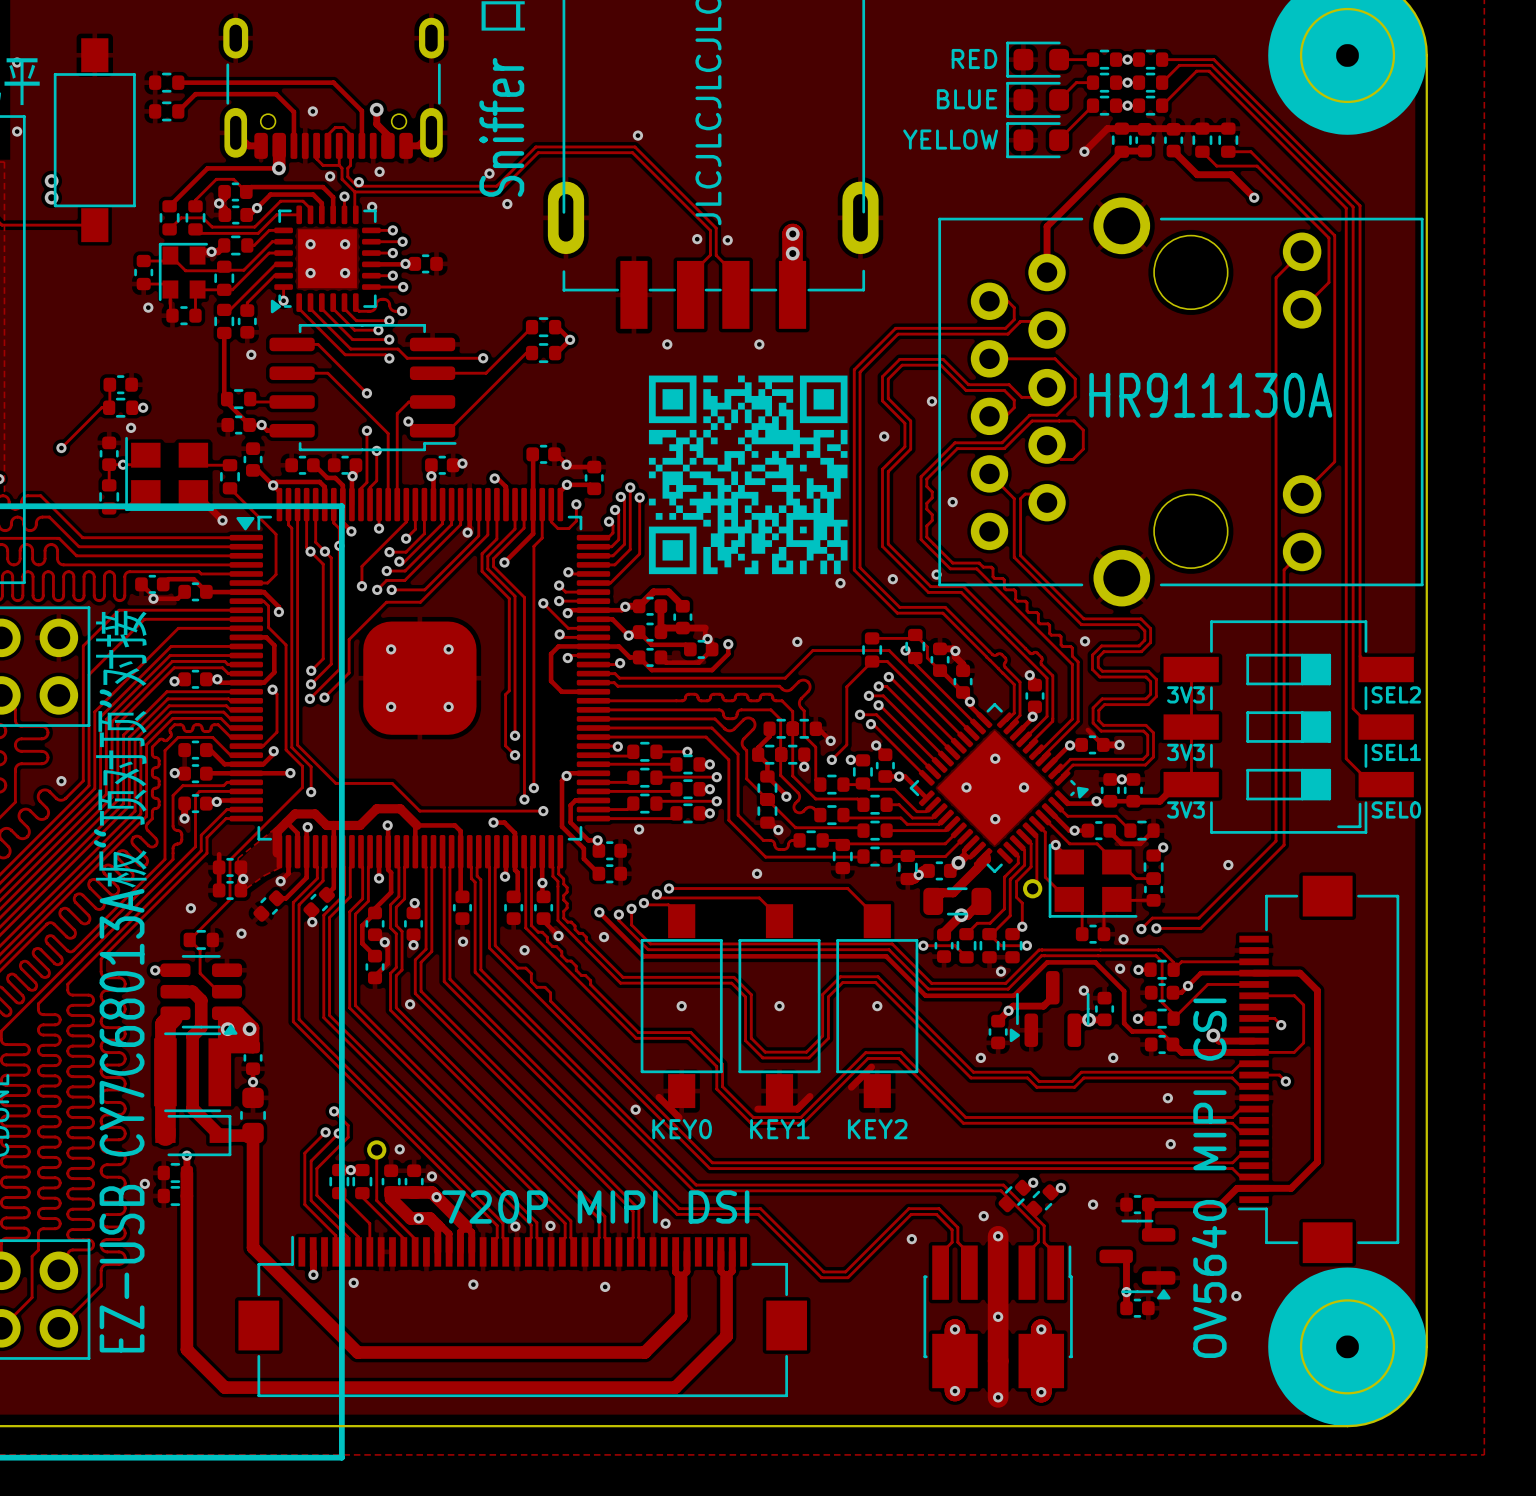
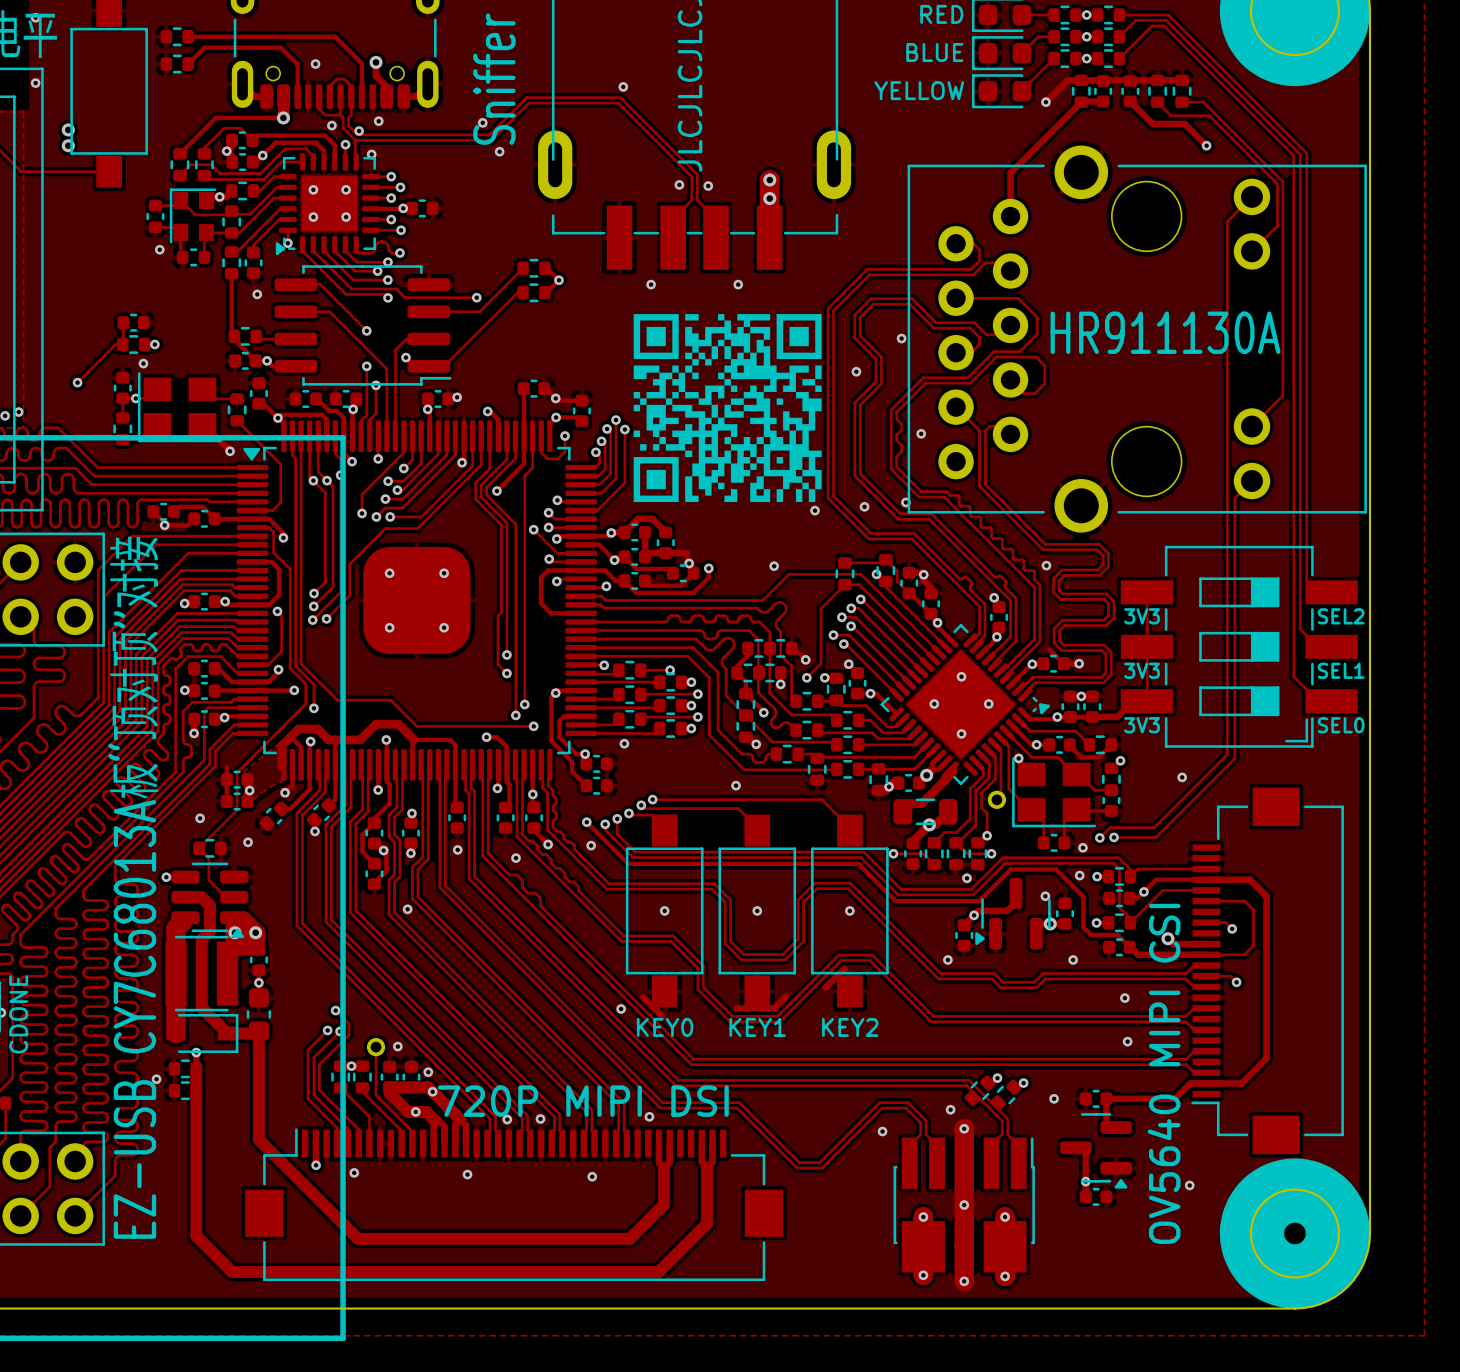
via: (61, 781) -> none

